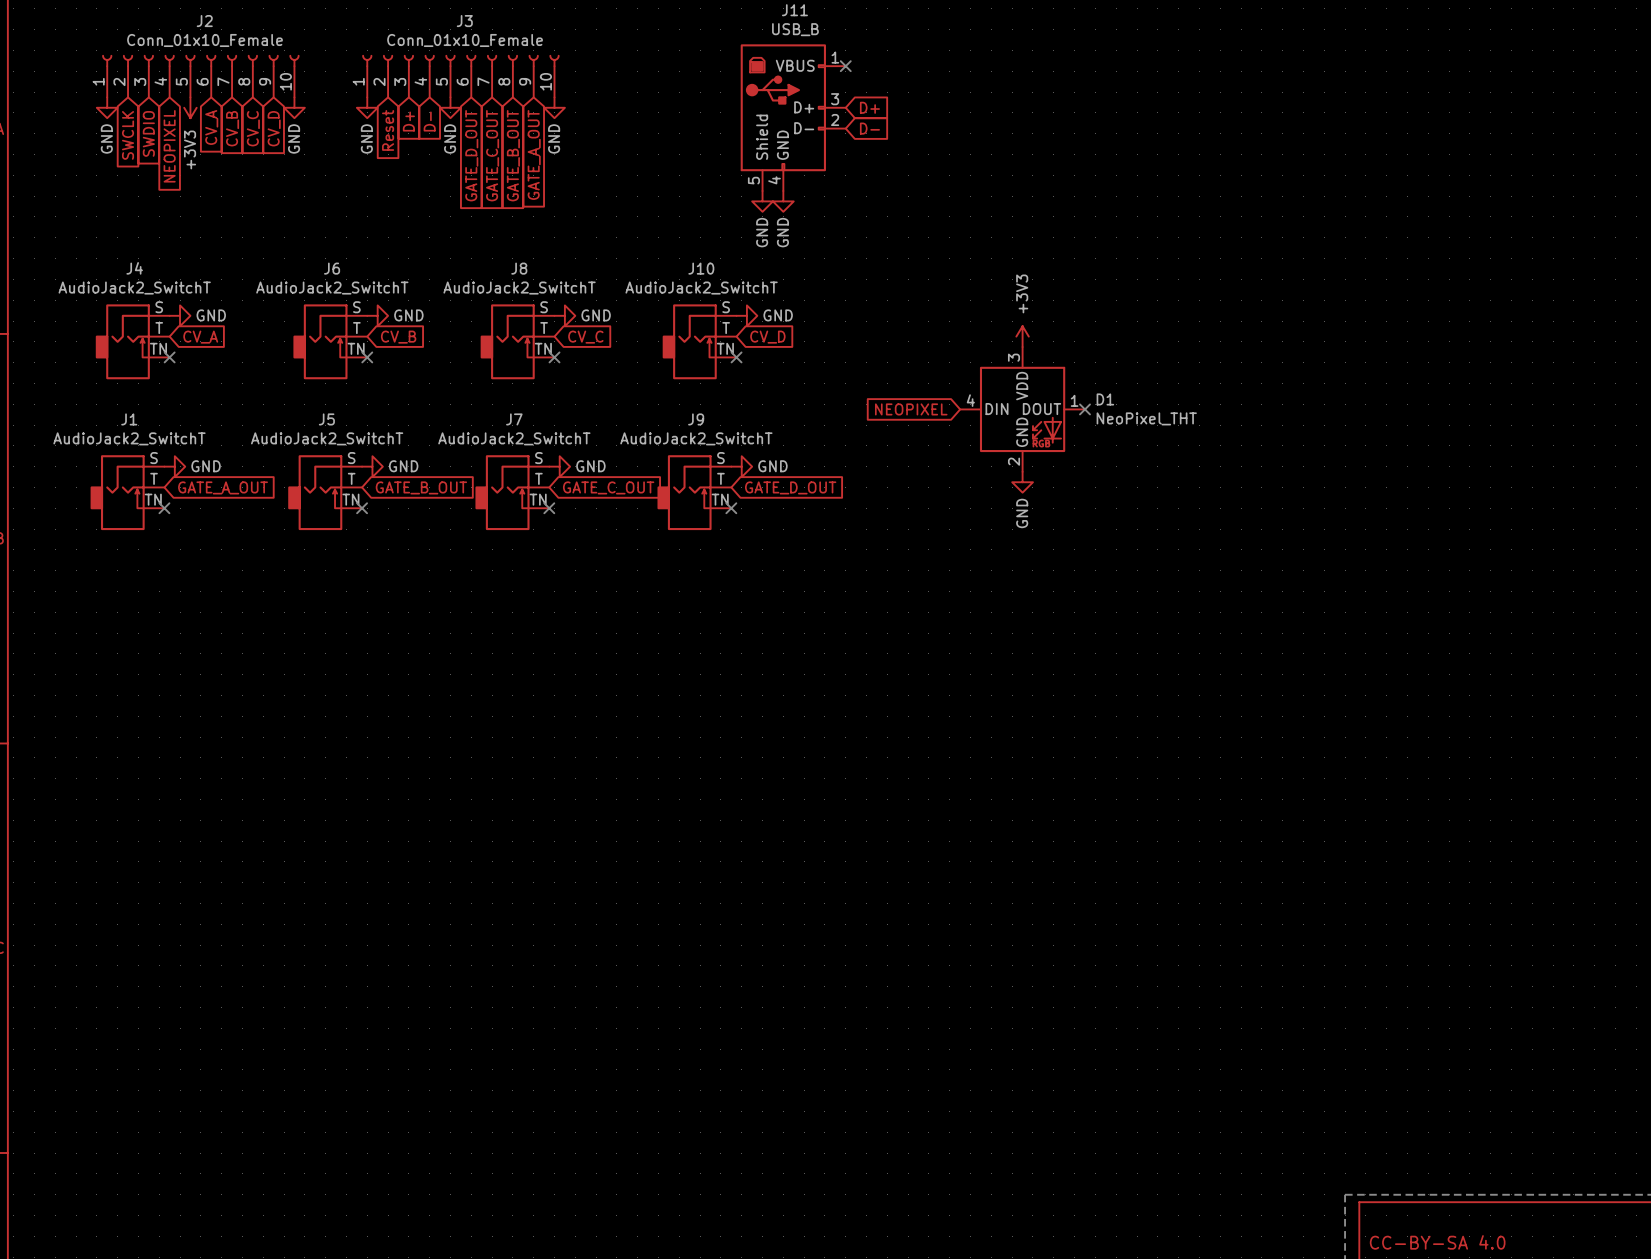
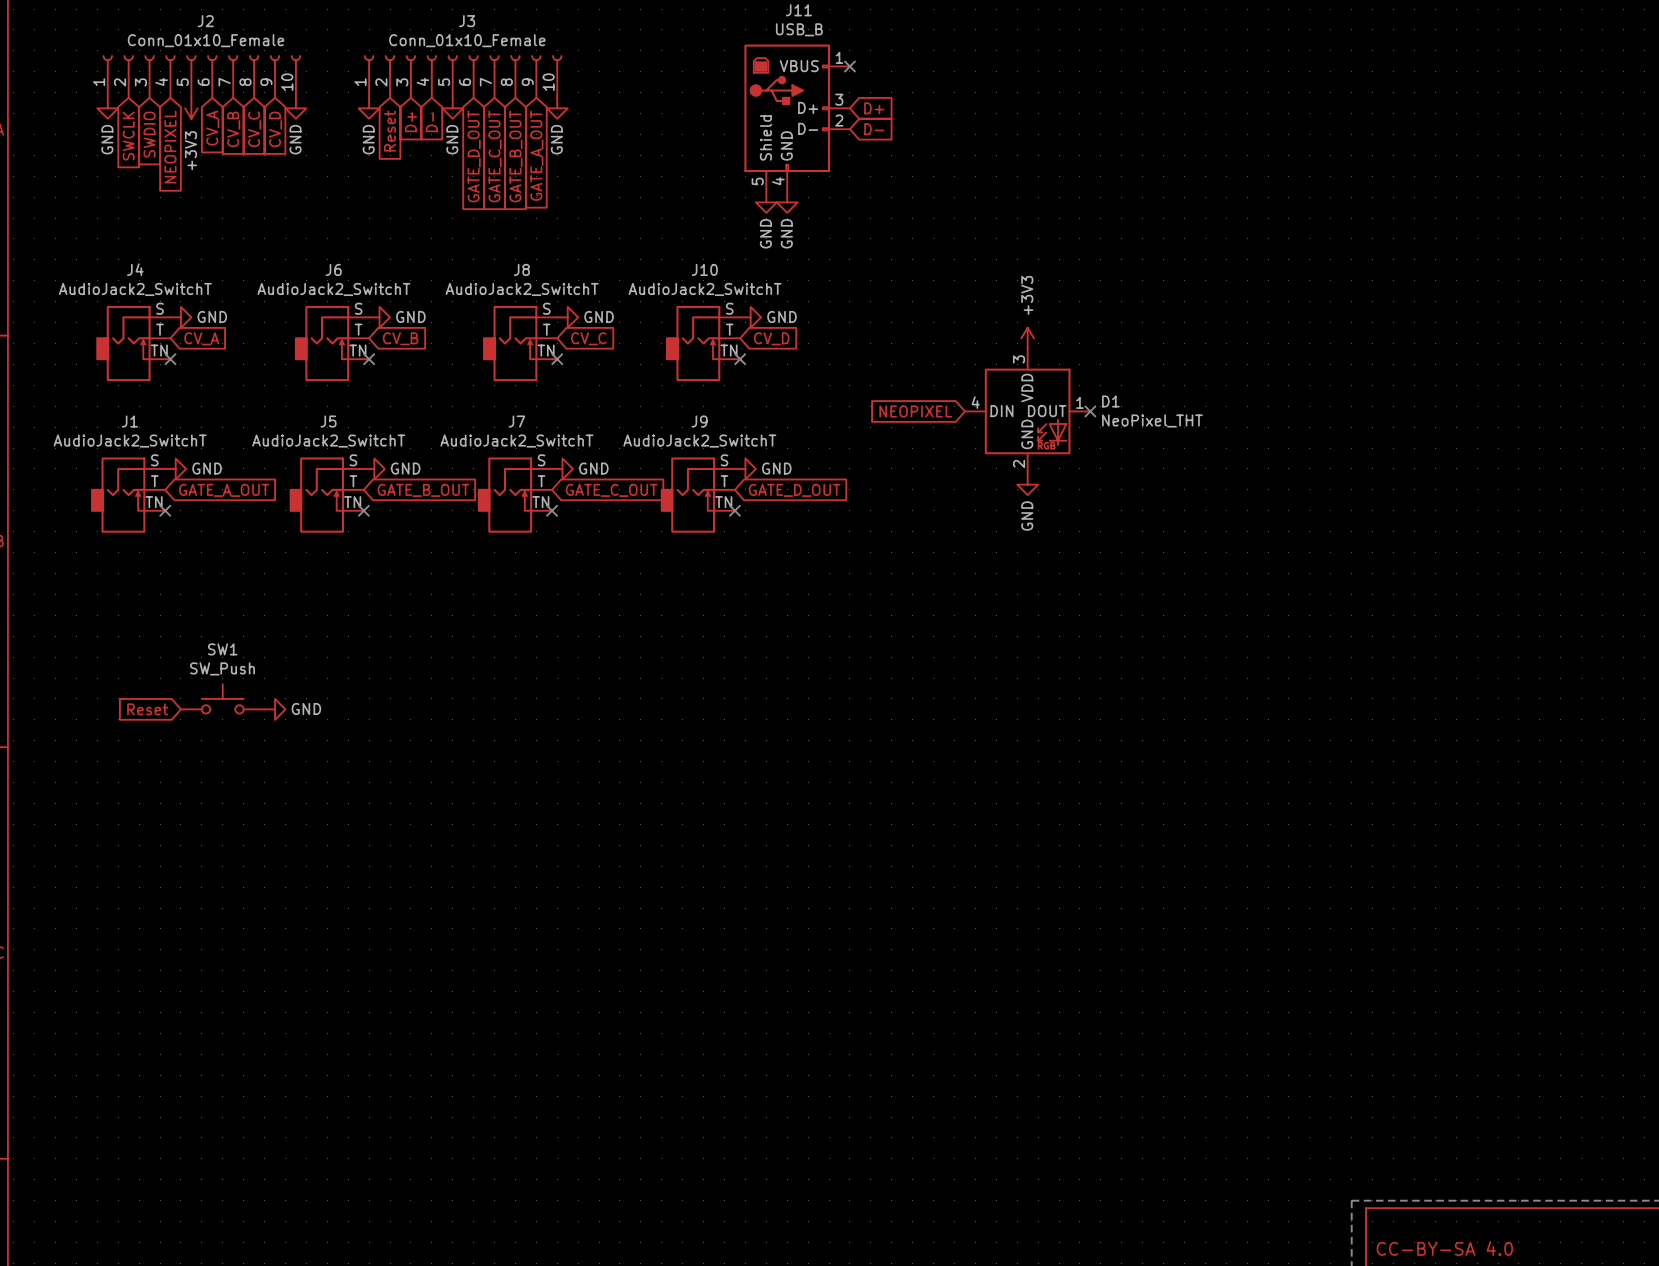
SW1: none -> SW_Push (222, 698)
global label: none -> Reset (147, 709)
power symbol: none -> GND (275, 709)

